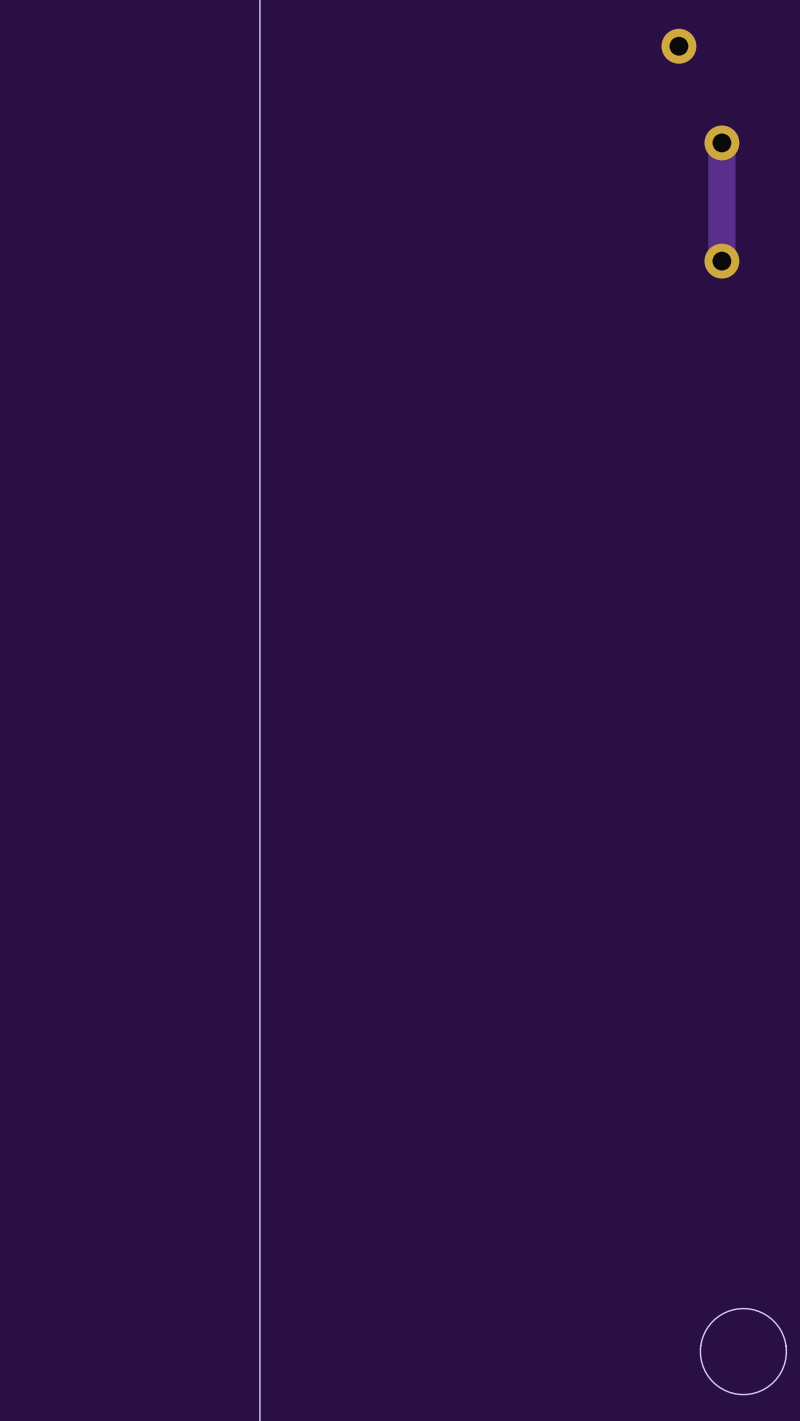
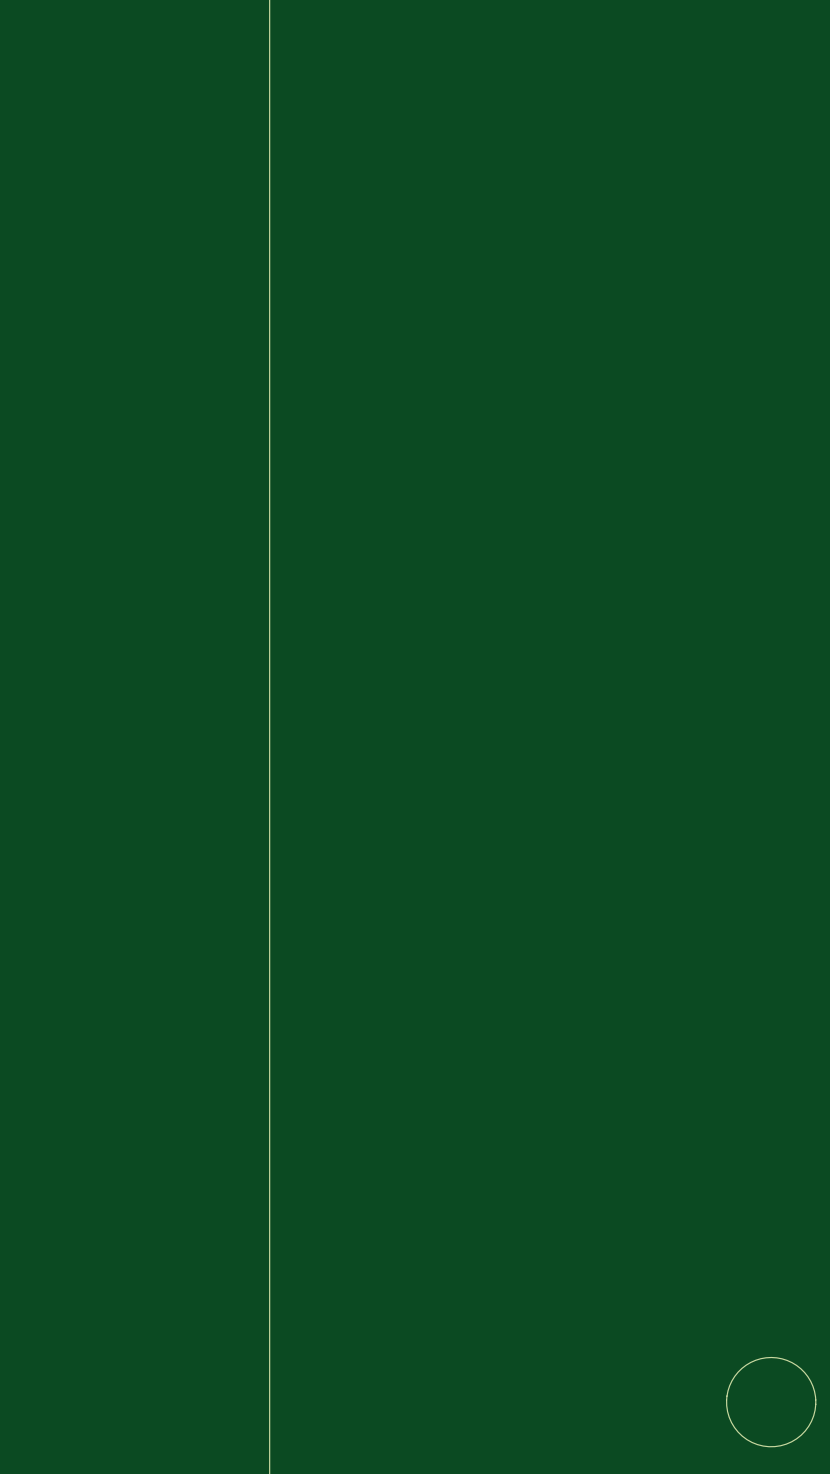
via: (678, 46) -> none
track: (721, 142) (721, 261) -> none
via: (721, 142) -> none
via: (721, 261) -> none

